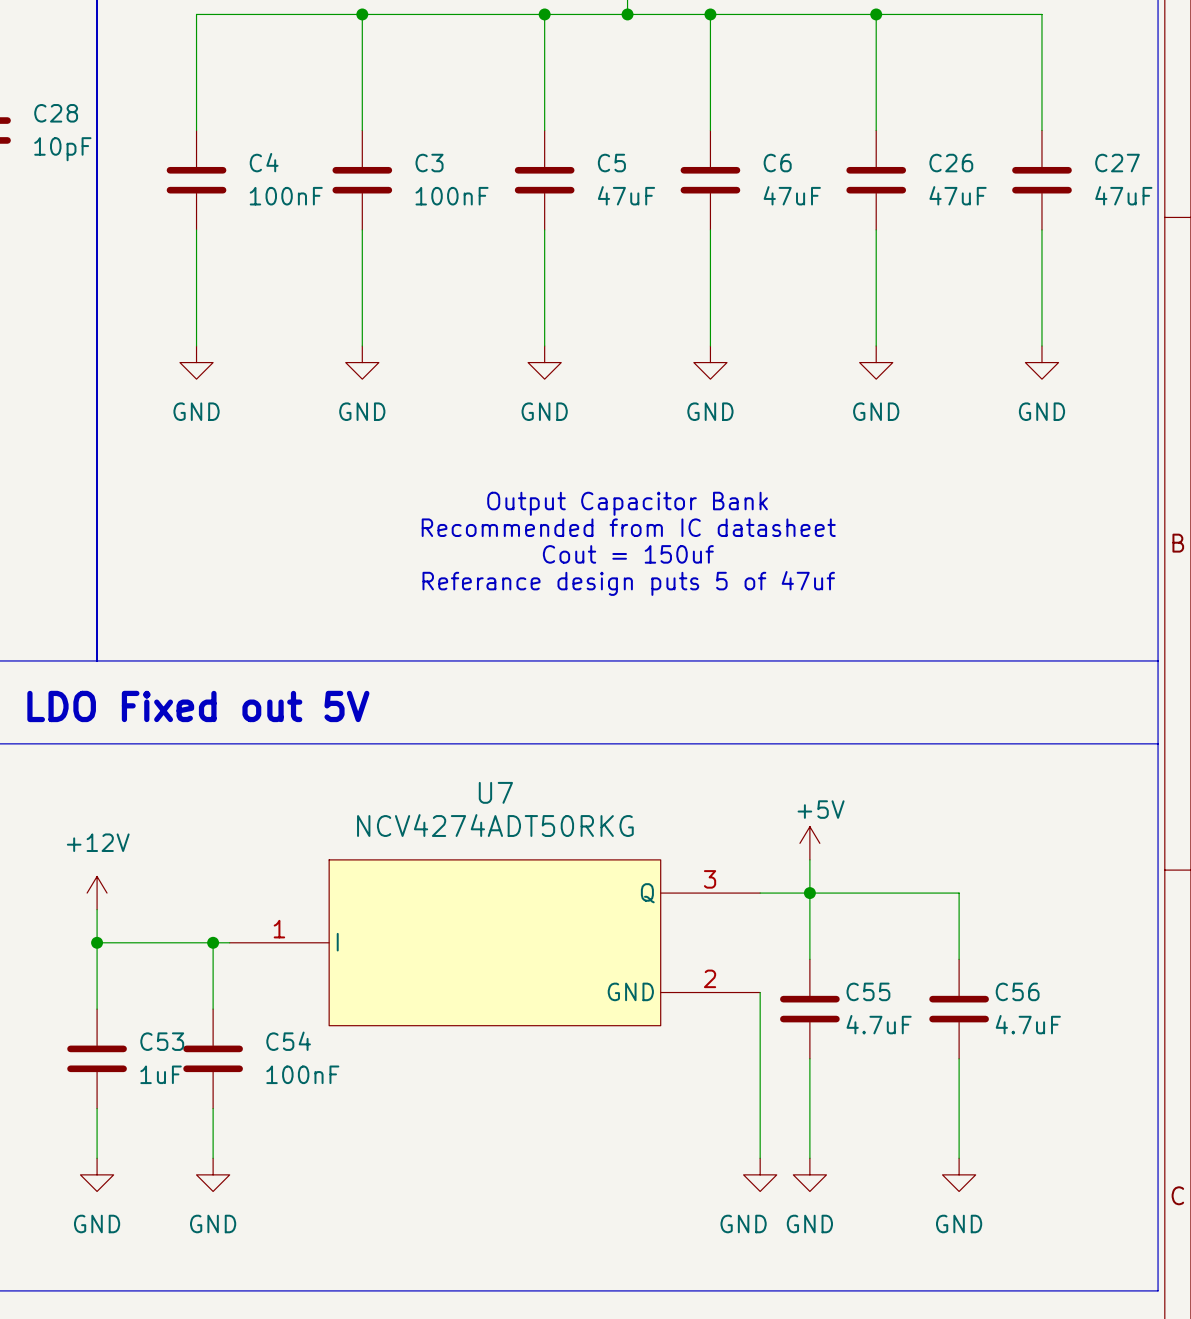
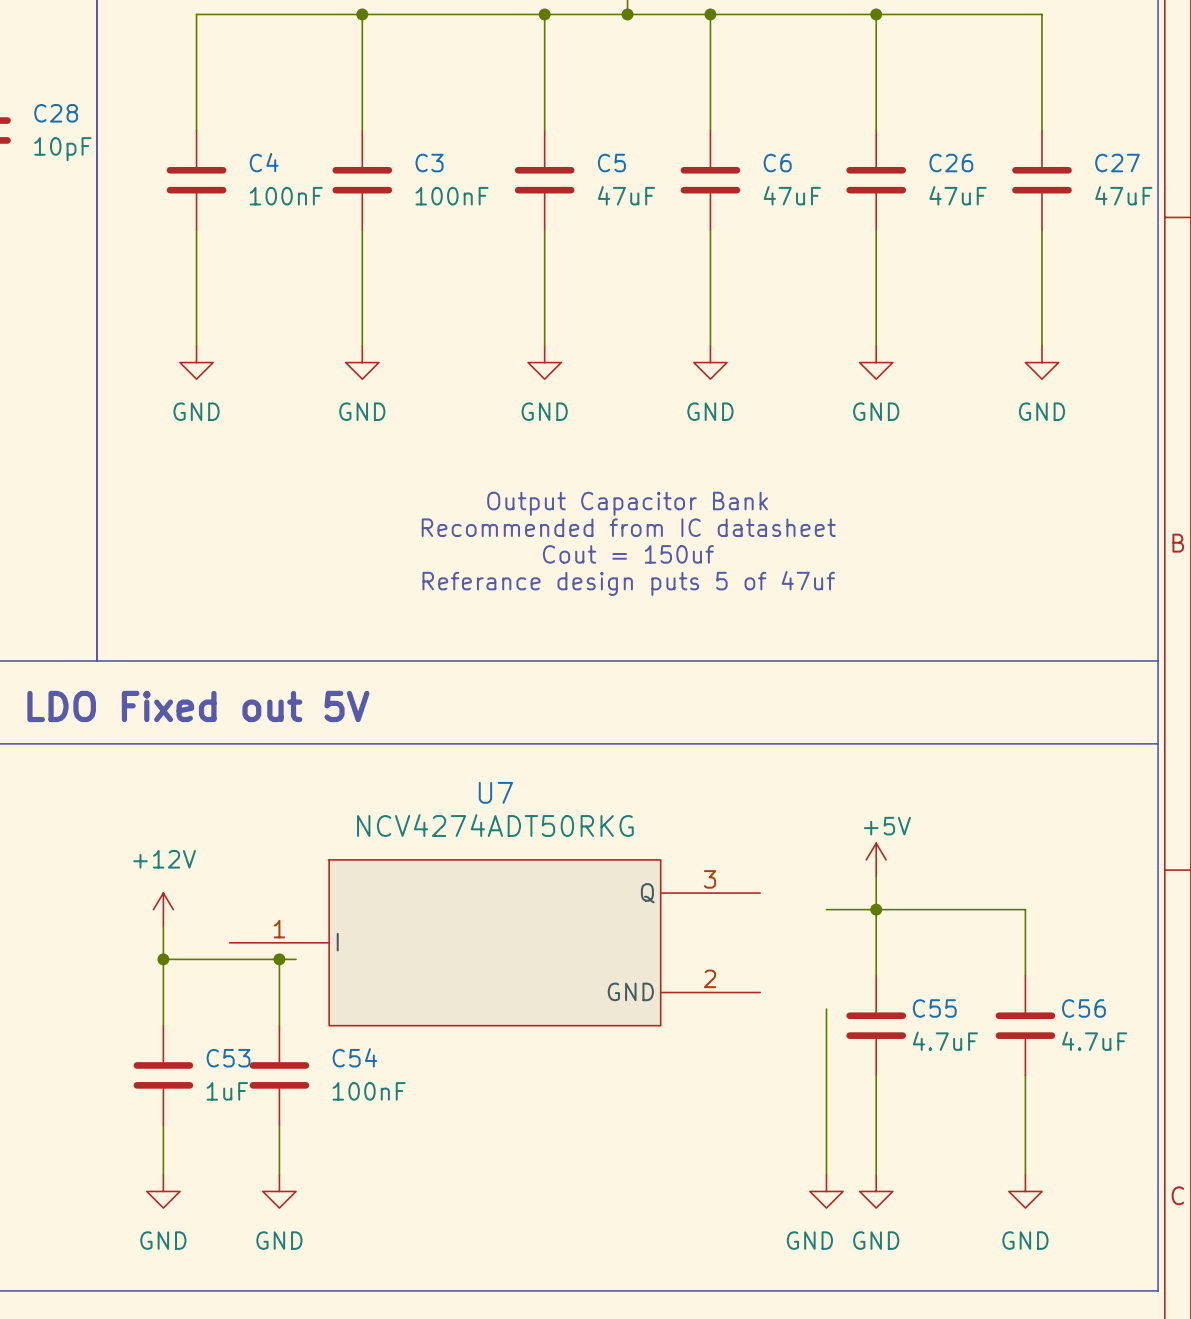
power symbol position: +5V (809, 843) -> +5V (876, 859)
wire: (809, 859) (809, 959) -> (876, 876) (876, 975)
power symbol position: +12V (97, 893) -> +12V (163, 909)
wire: (760, 893) (959, 893) (959, 959) -> (826, 909) (1025, 909) (1025, 975)
junction position: (809, 893) -> (876, 909)
wire: (97, 909) (97, 1009) -> (163, 926) (163, 1025)
wire: (97, 942) (229, 942) -> (163, 959) (295, 959)
junction: (97, 942) -> none
wire: (213, 942) (213, 1009) -> (279, 959) (279, 1025)
junction: (213, 942) -> none
junction: none -> (163, 959)
junction: none -> (279, 959)
wire: (760, 992) (760, 1158) -> (826, 1009) (826, 1174)
C55 position: (809, 1009) -> (876, 1025)
C56 position: (959, 1009) -> (1025, 1025)
C53 position: (97, 1058) -> (163, 1075)
C54 position: (213, 1058) -> (279, 1075)
wire: (809, 1058) (809, 1158) -> (876, 1075) (876, 1174)
wire: (959, 1058) (959, 1158) -> (1025, 1075) (1025, 1174)
wire: (97, 1108) (97, 1158) -> (163, 1125) (163, 1174)
wire: (213, 1108) (213, 1158) -> (279, 1125) (279, 1174)
power symbol: GND (97, 1174) -> none
power symbol: GND (213, 1174) -> none
power symbol: GND (760, 1174) -> none
power symbol position: GND (809, 1174) -> GND (826, 1191)
power symbol: GND (959, 1174) -> none
power symbol: none -> GND (163, 1191)
power symbol: none -> GND (279, 1191)
power symbol: none -> GND (876, 1191)
power symbol: none -> GND (1025, 1191)
power symbol text position: GND (809, 1223) -> GND (809, 1240)

